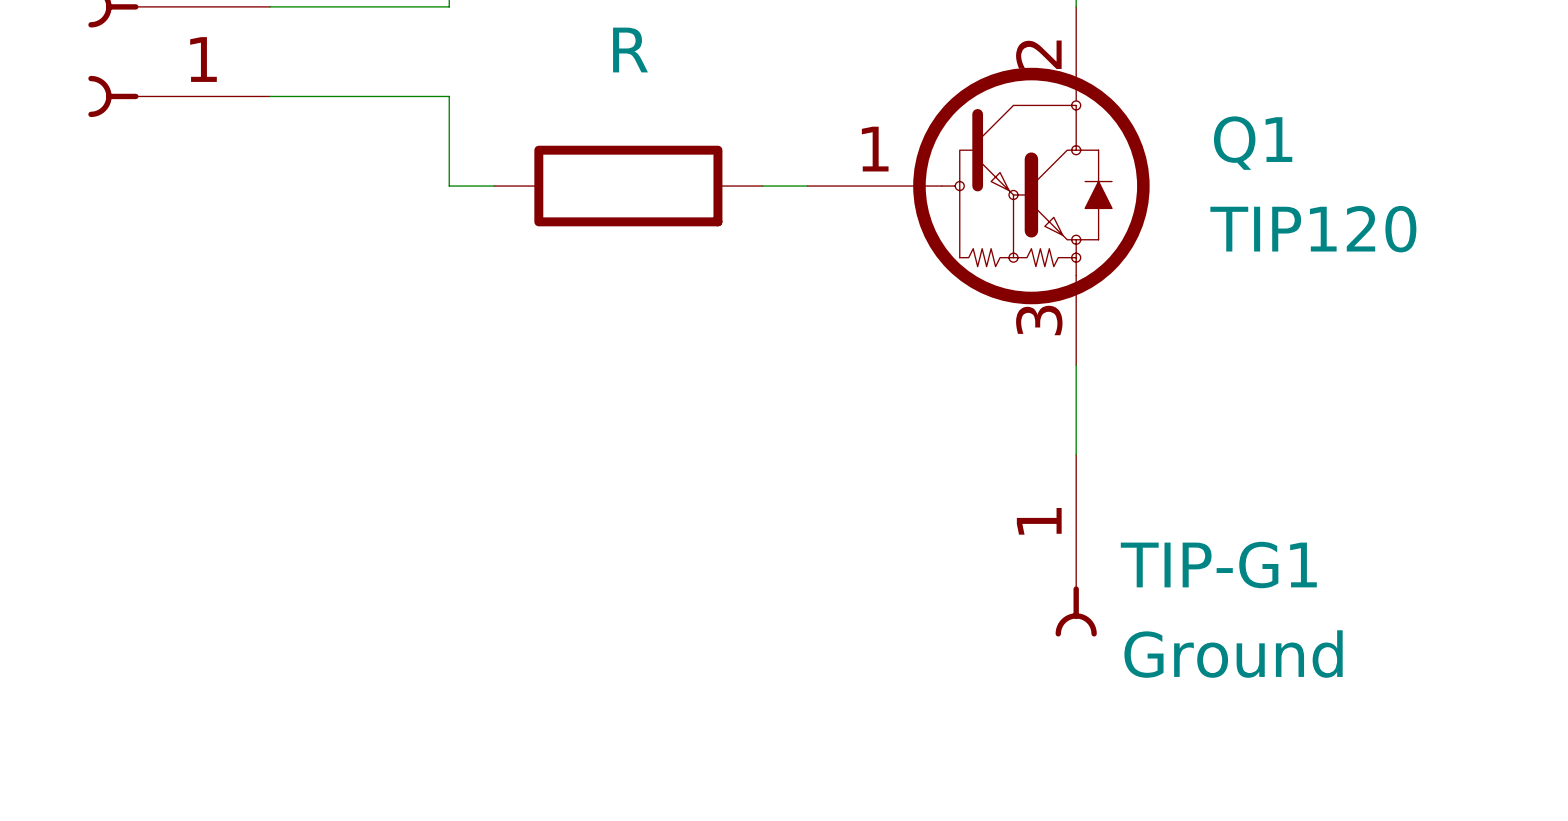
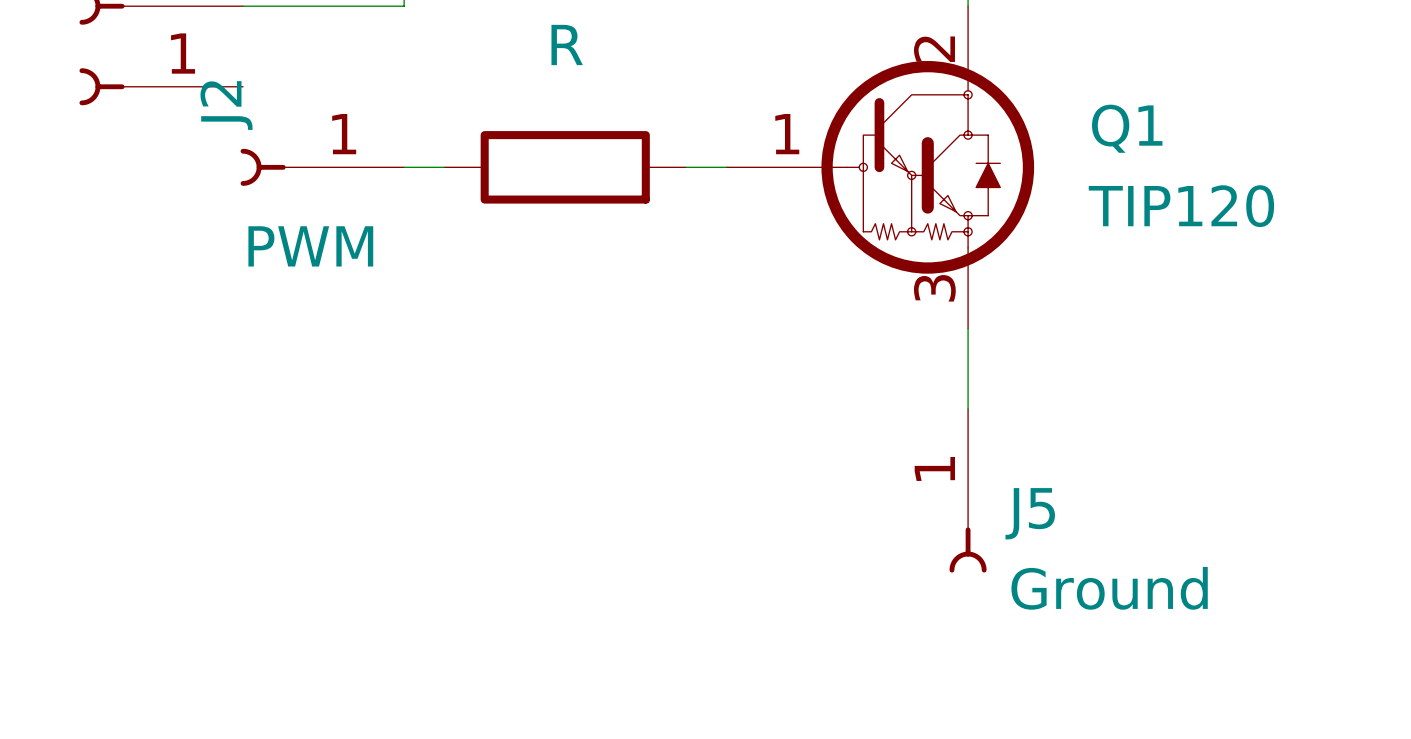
wire: (270, 96) (449, 96) (449, 186) -> none
J2: none -> PWM (322, 167)
TIP-G1 name: TIP-G1 (1218, 565) -> J5 (1030, 513)

